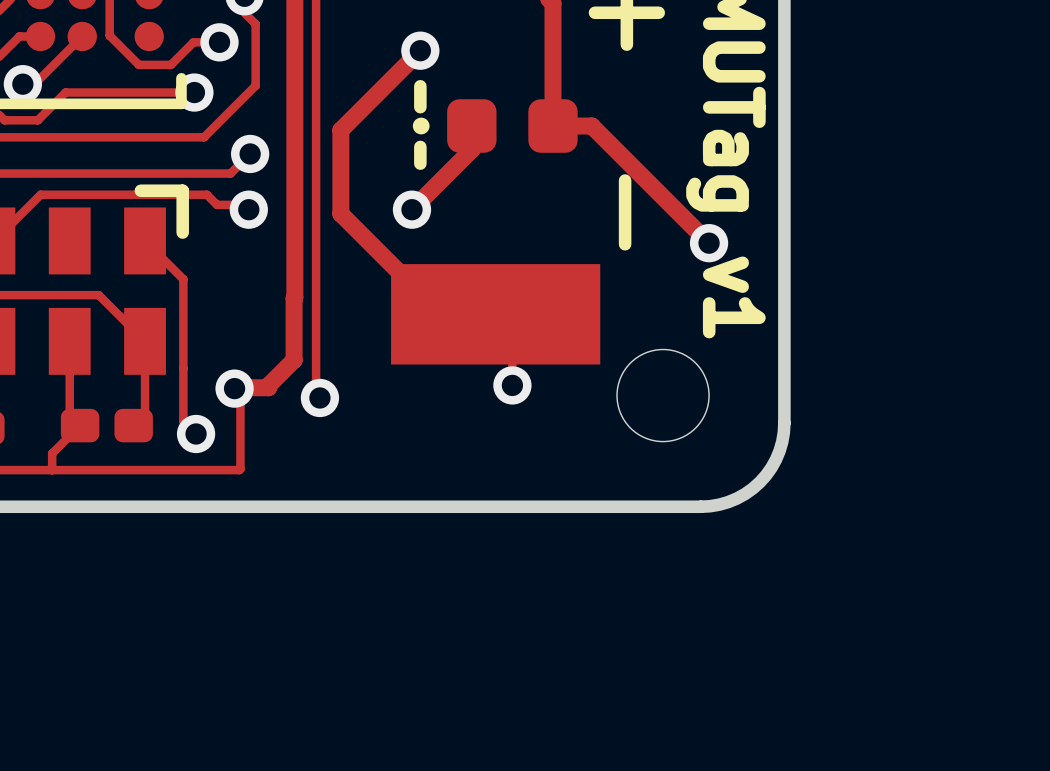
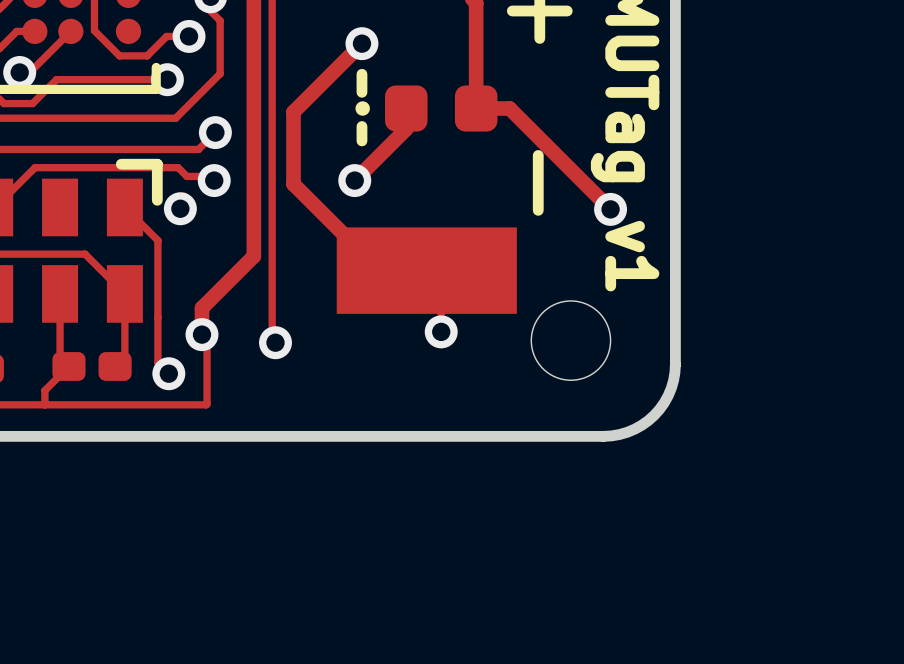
via: none -> (180, 208)
track: (294, 298) (294, 360) (268, 387) (235, 387) -> (253, 256) (201, 308) (201, 334)

